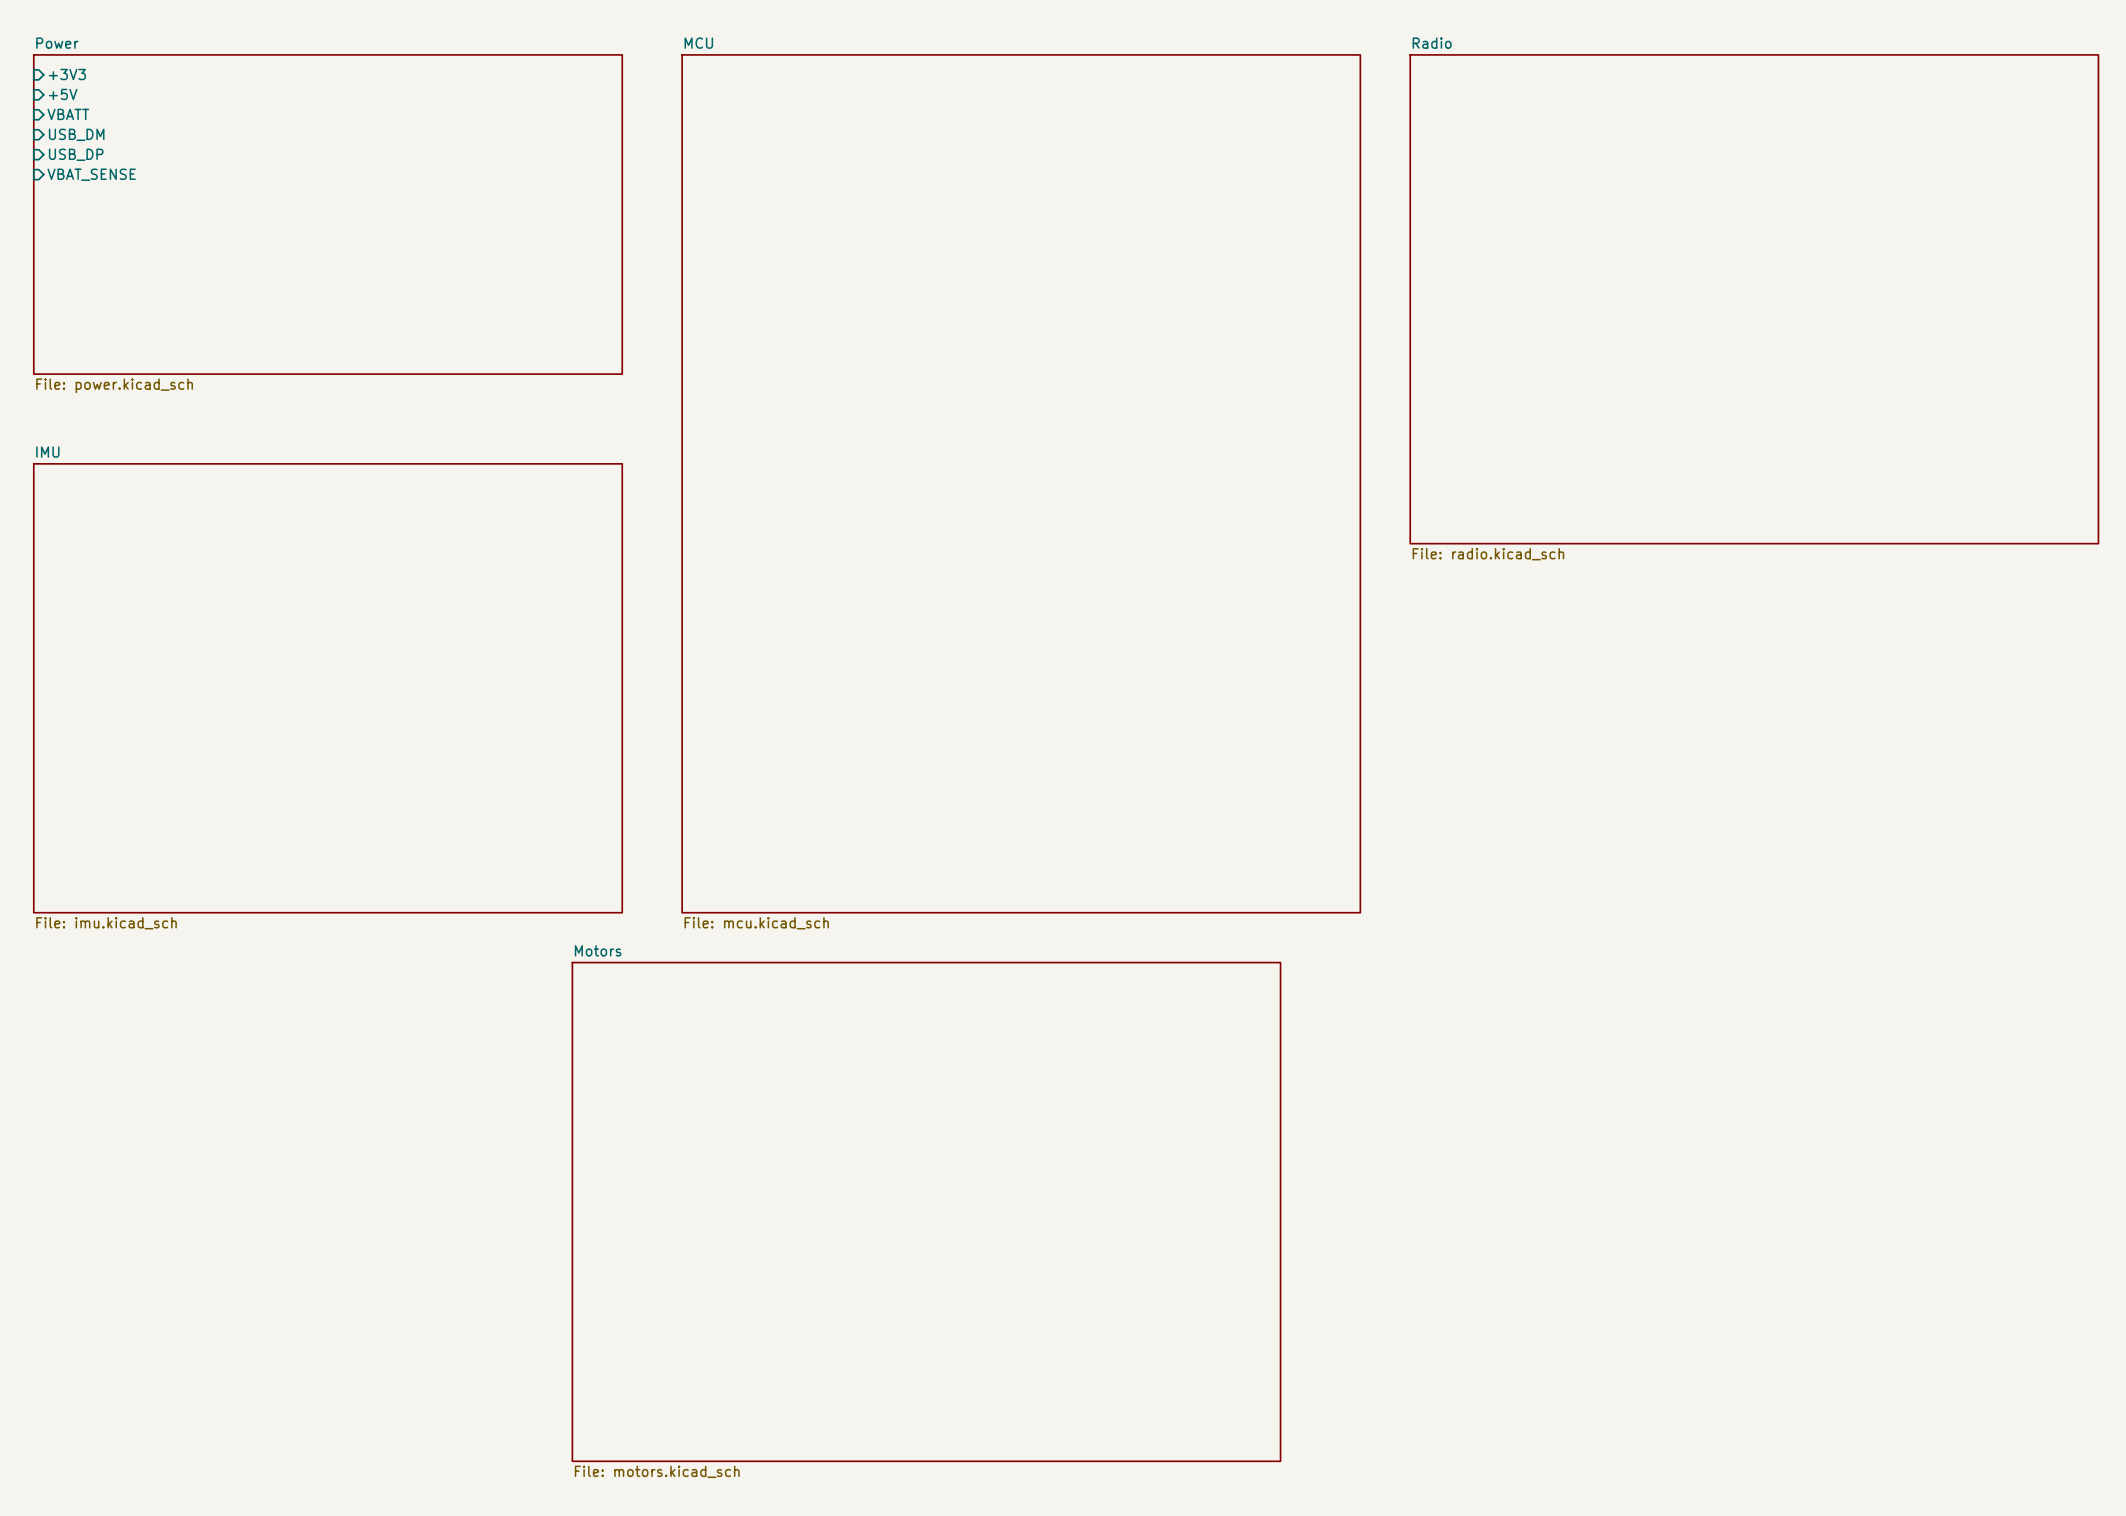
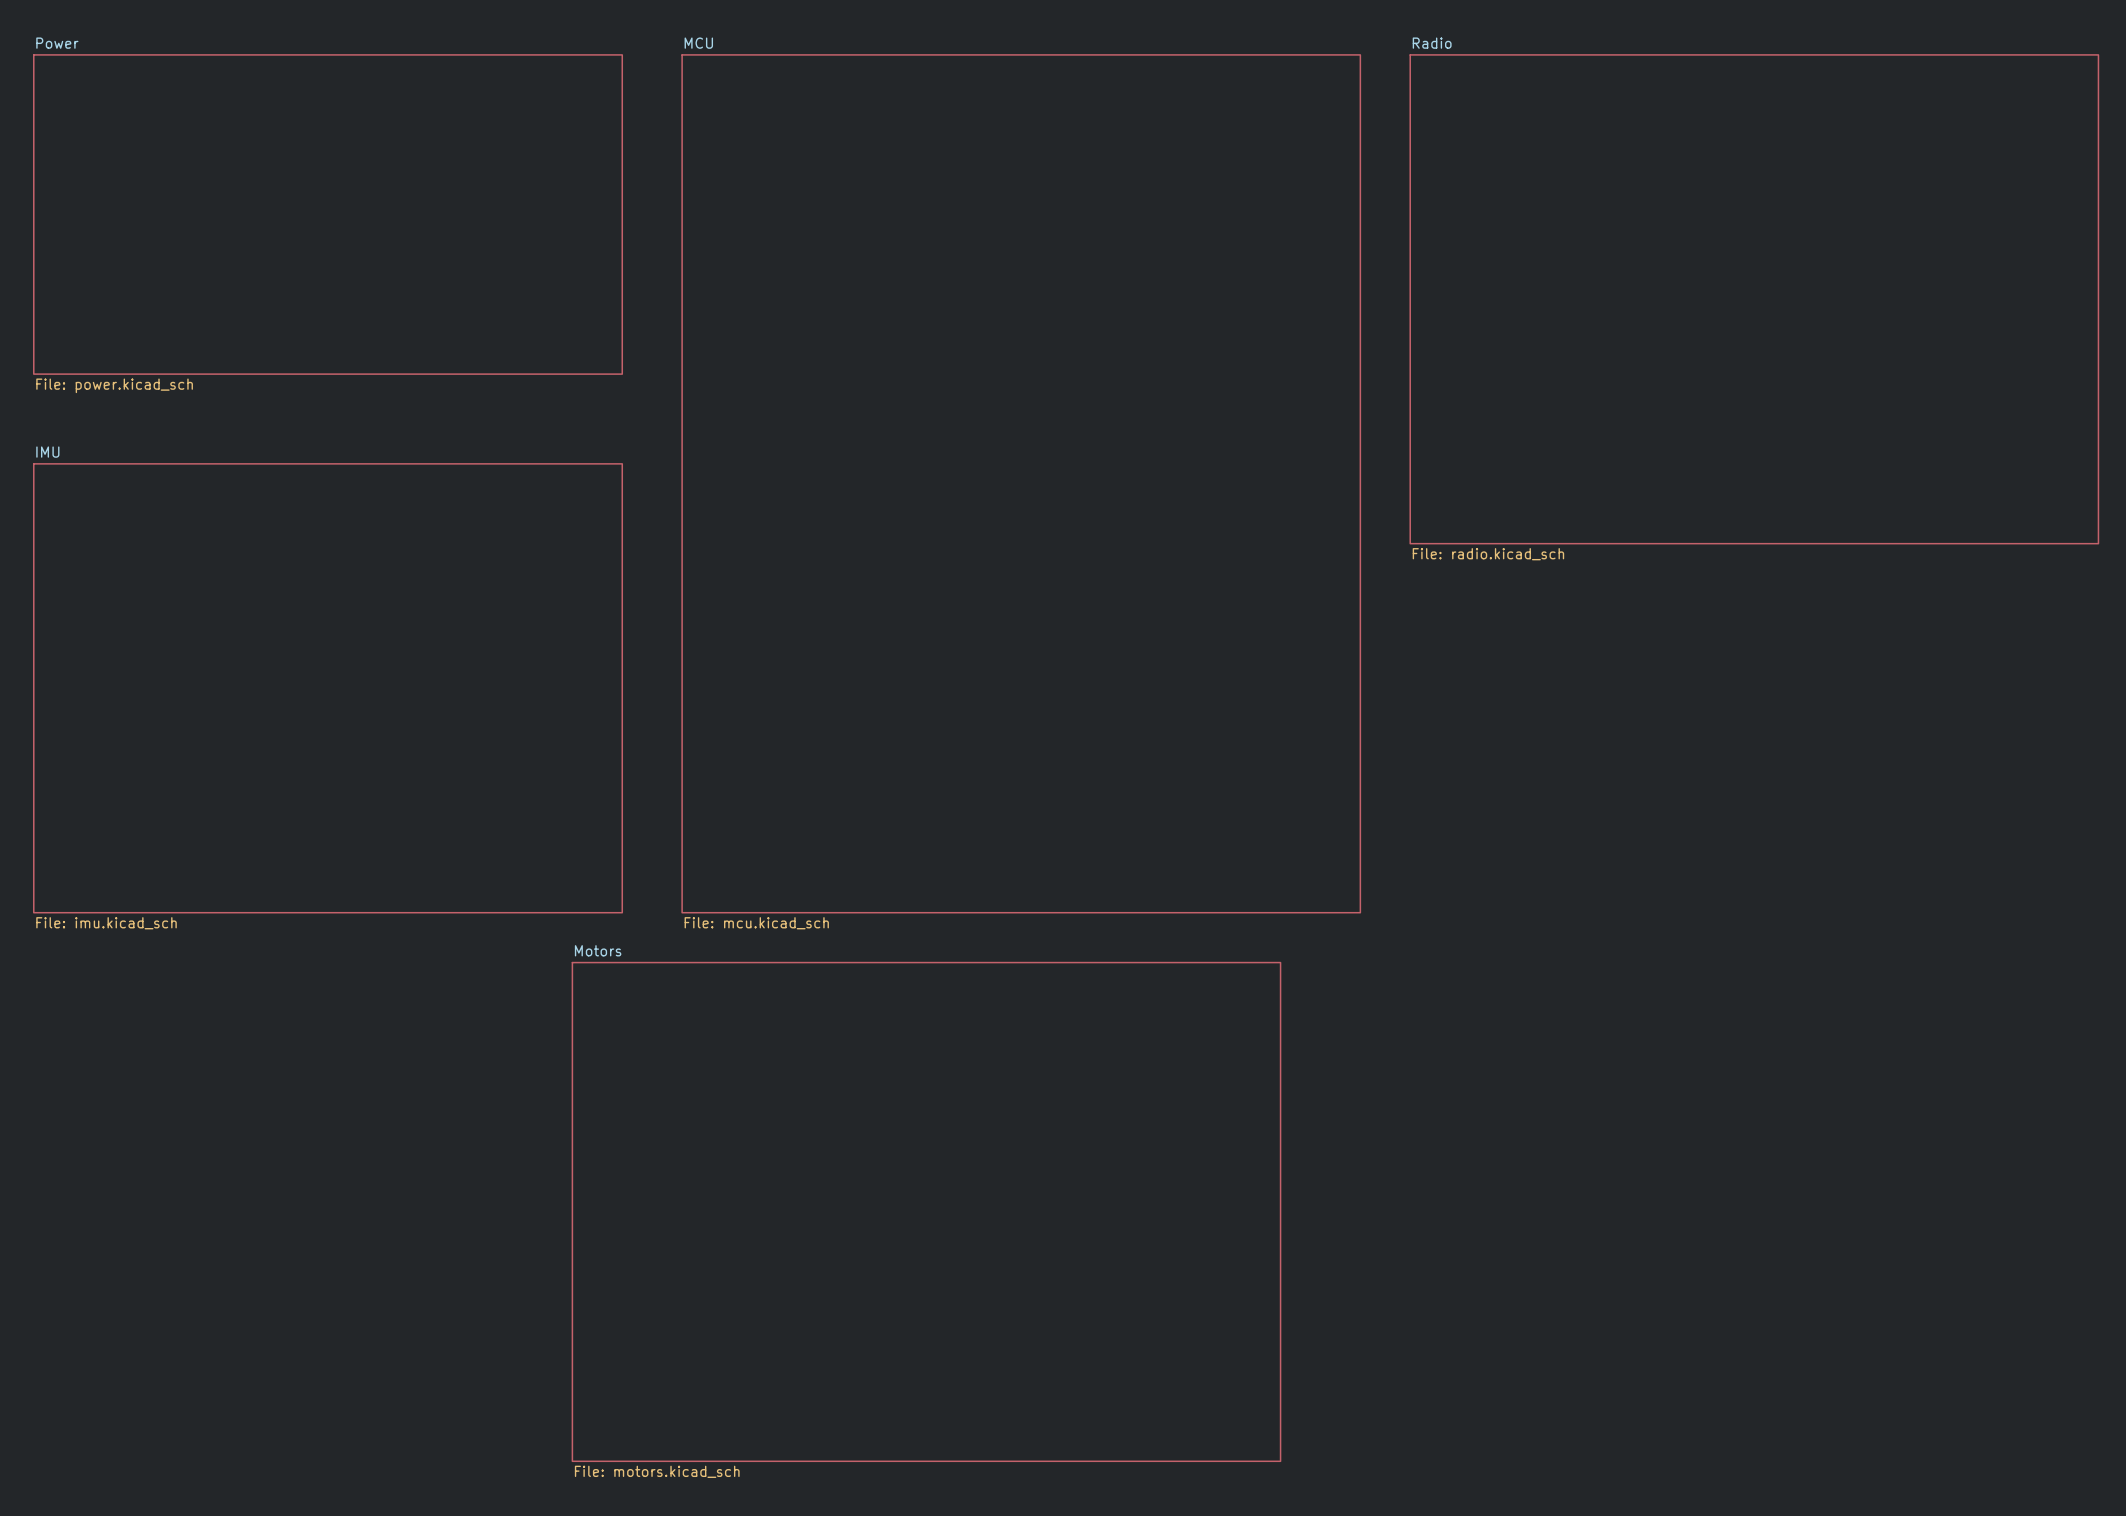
sheet pin: +3V3 (67, 74) -> none
sheet pin: +5V (63, 94) -> none
sheet pin: VBATT (68, 114) -> none
sheet pin: USB_DM (76, 134) -> none
sheet pin: USB_DP (76, 154) -> none
sheet pin: VBAT_SENSE (91, 174) -> none

